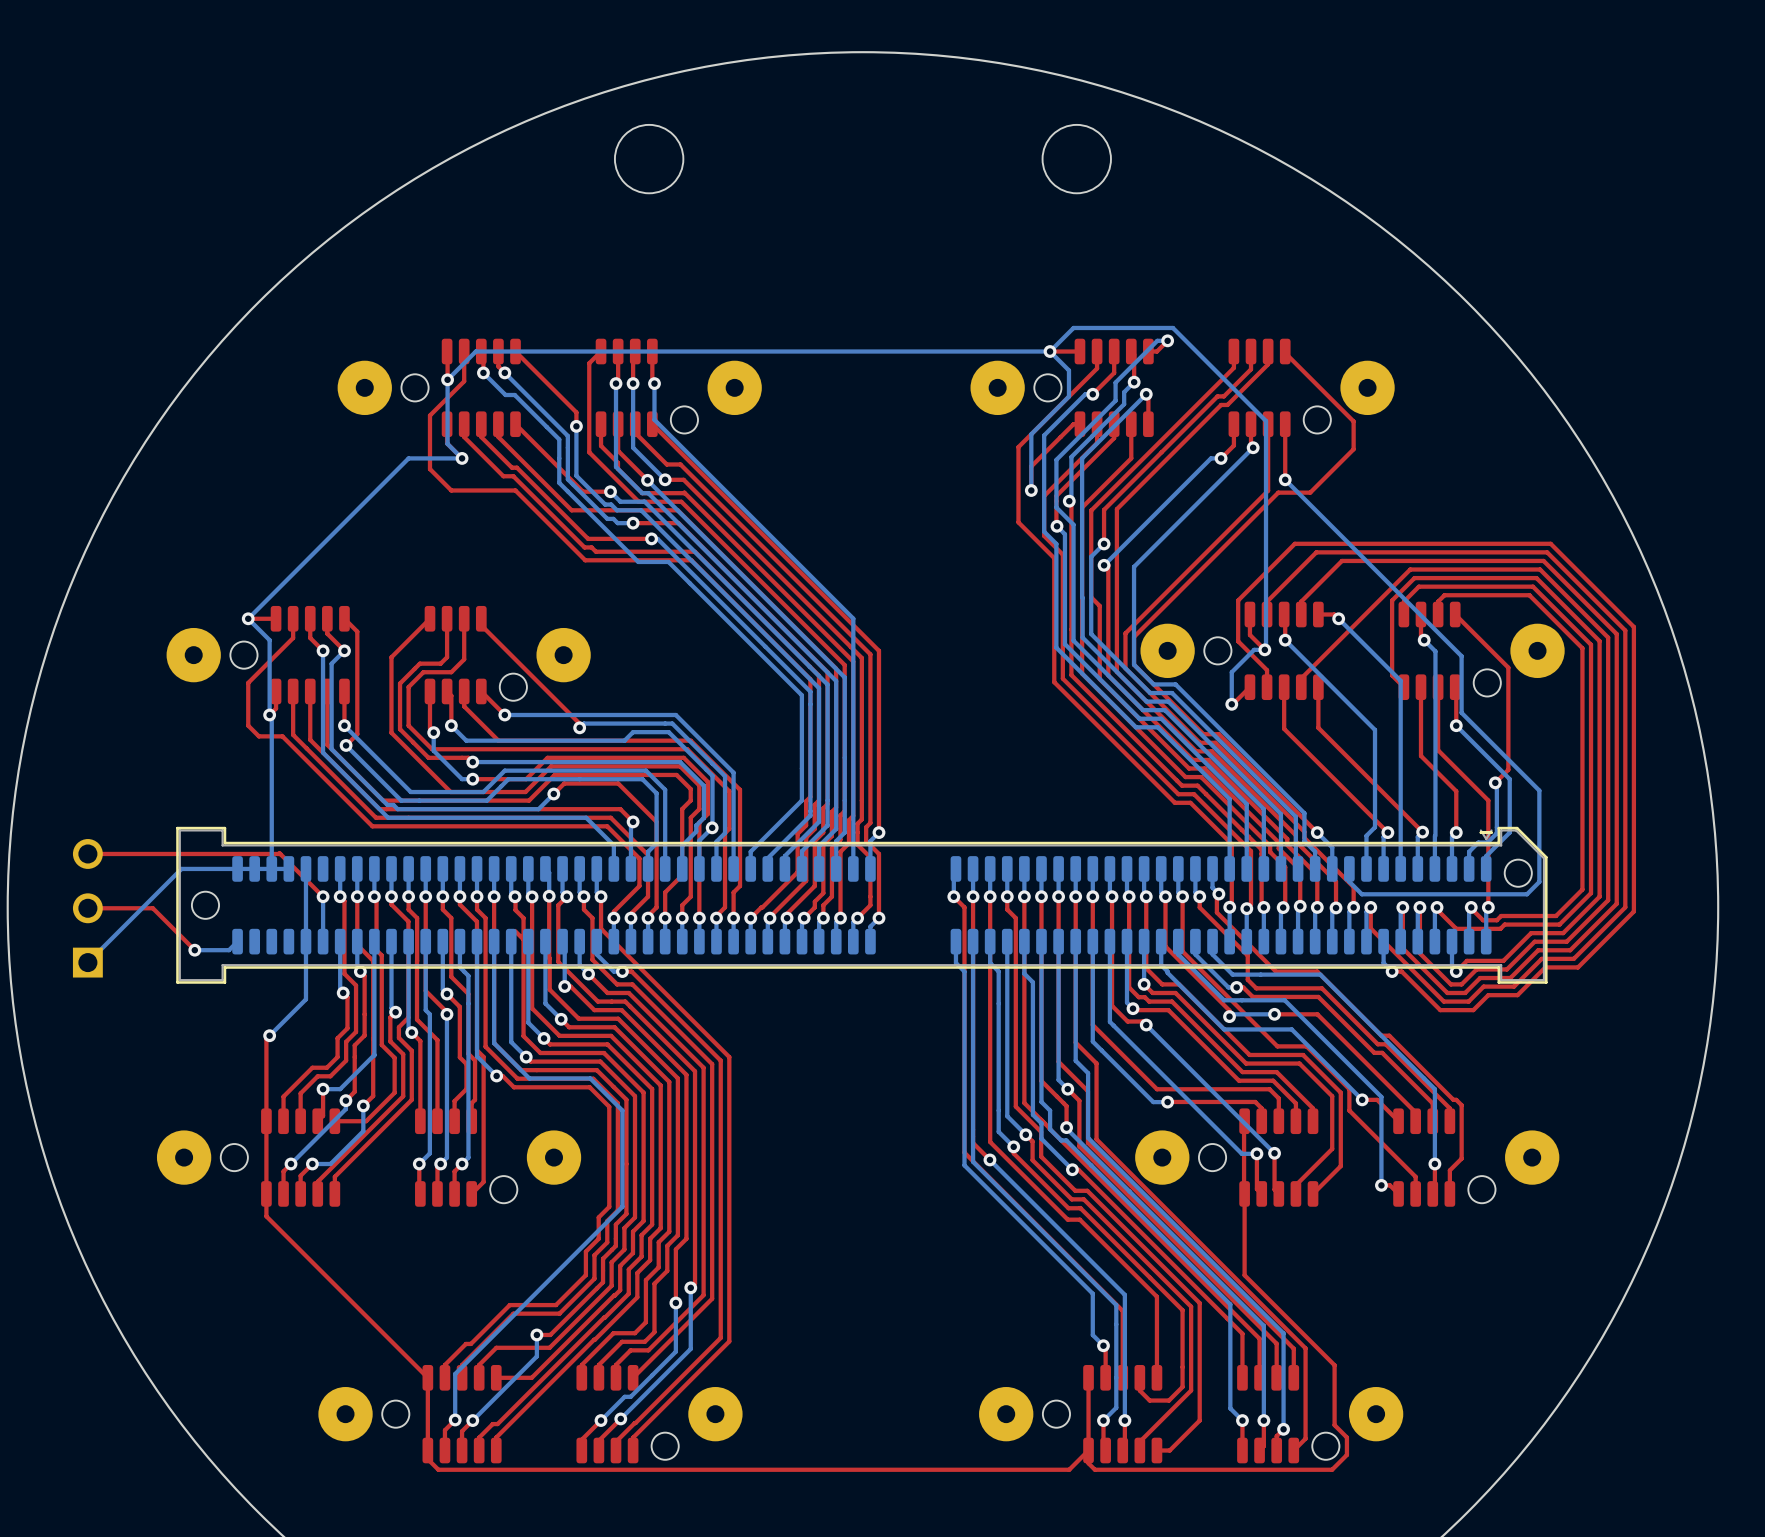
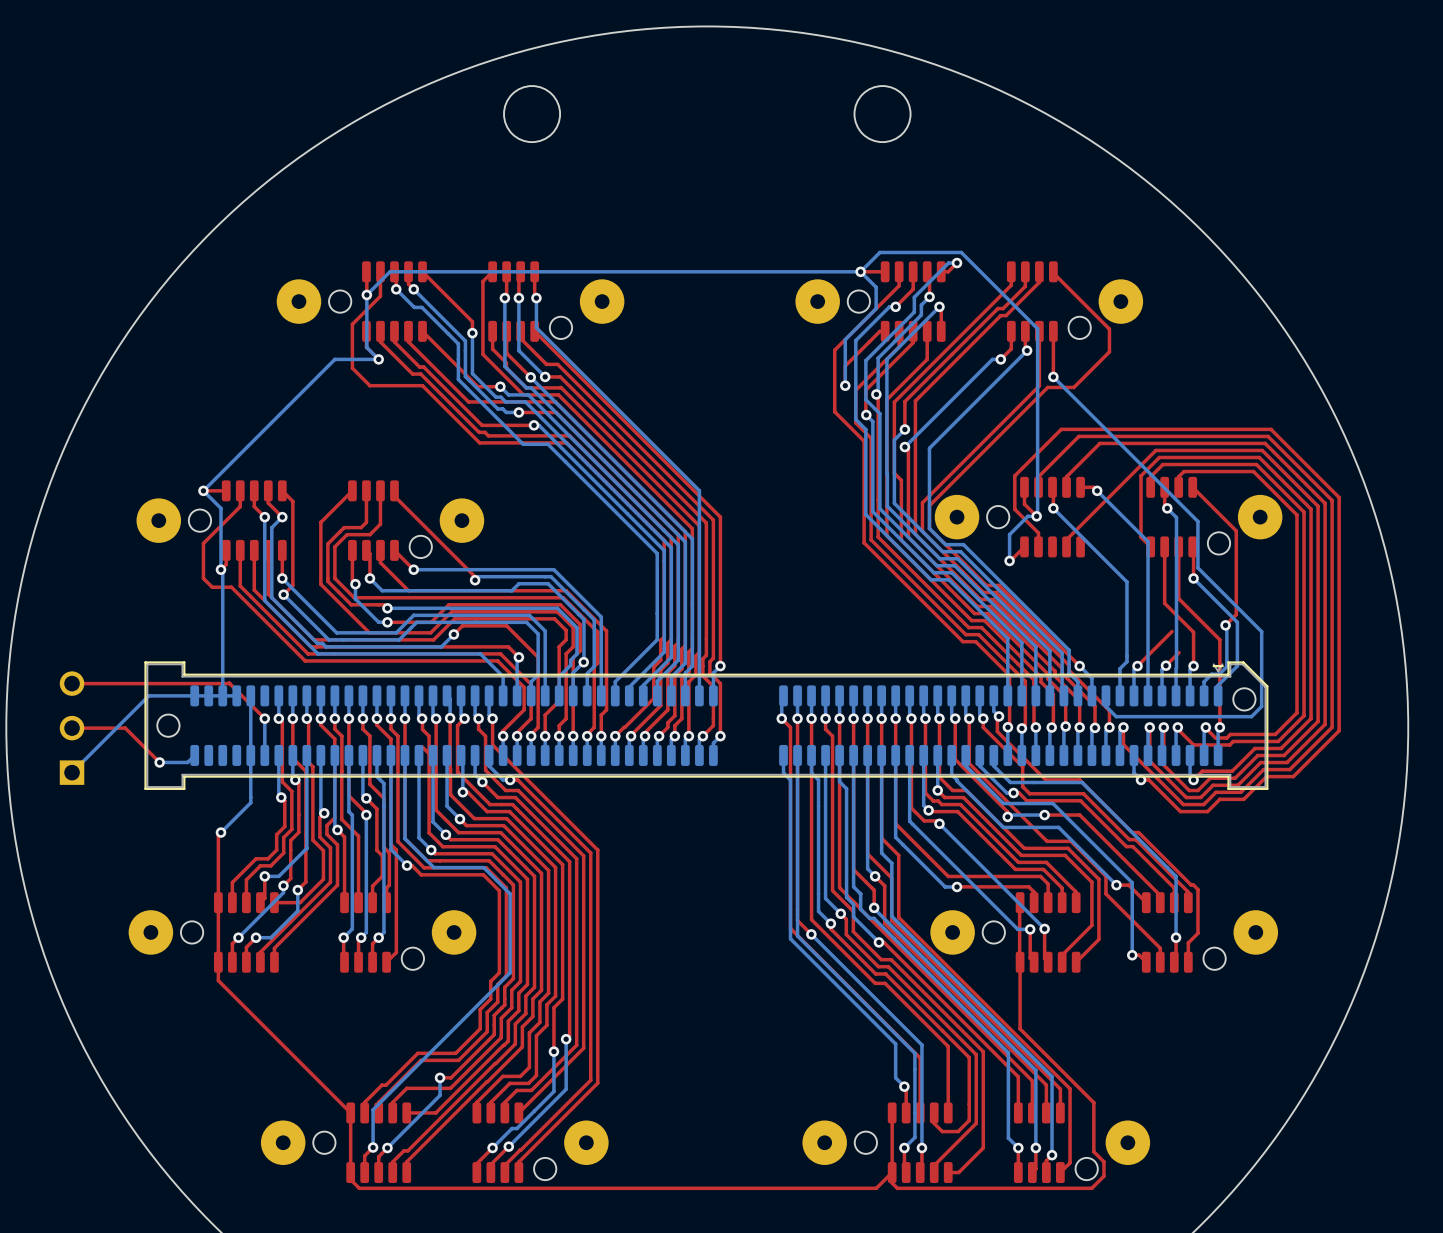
top track: (1284, 687) (1284, 728) (1387, 832) -> (1172, 631) (1137, 666)
top track: (1318, 687) (1318, 727) (1422, 832) -> (1179, 652) (1165, 665)

